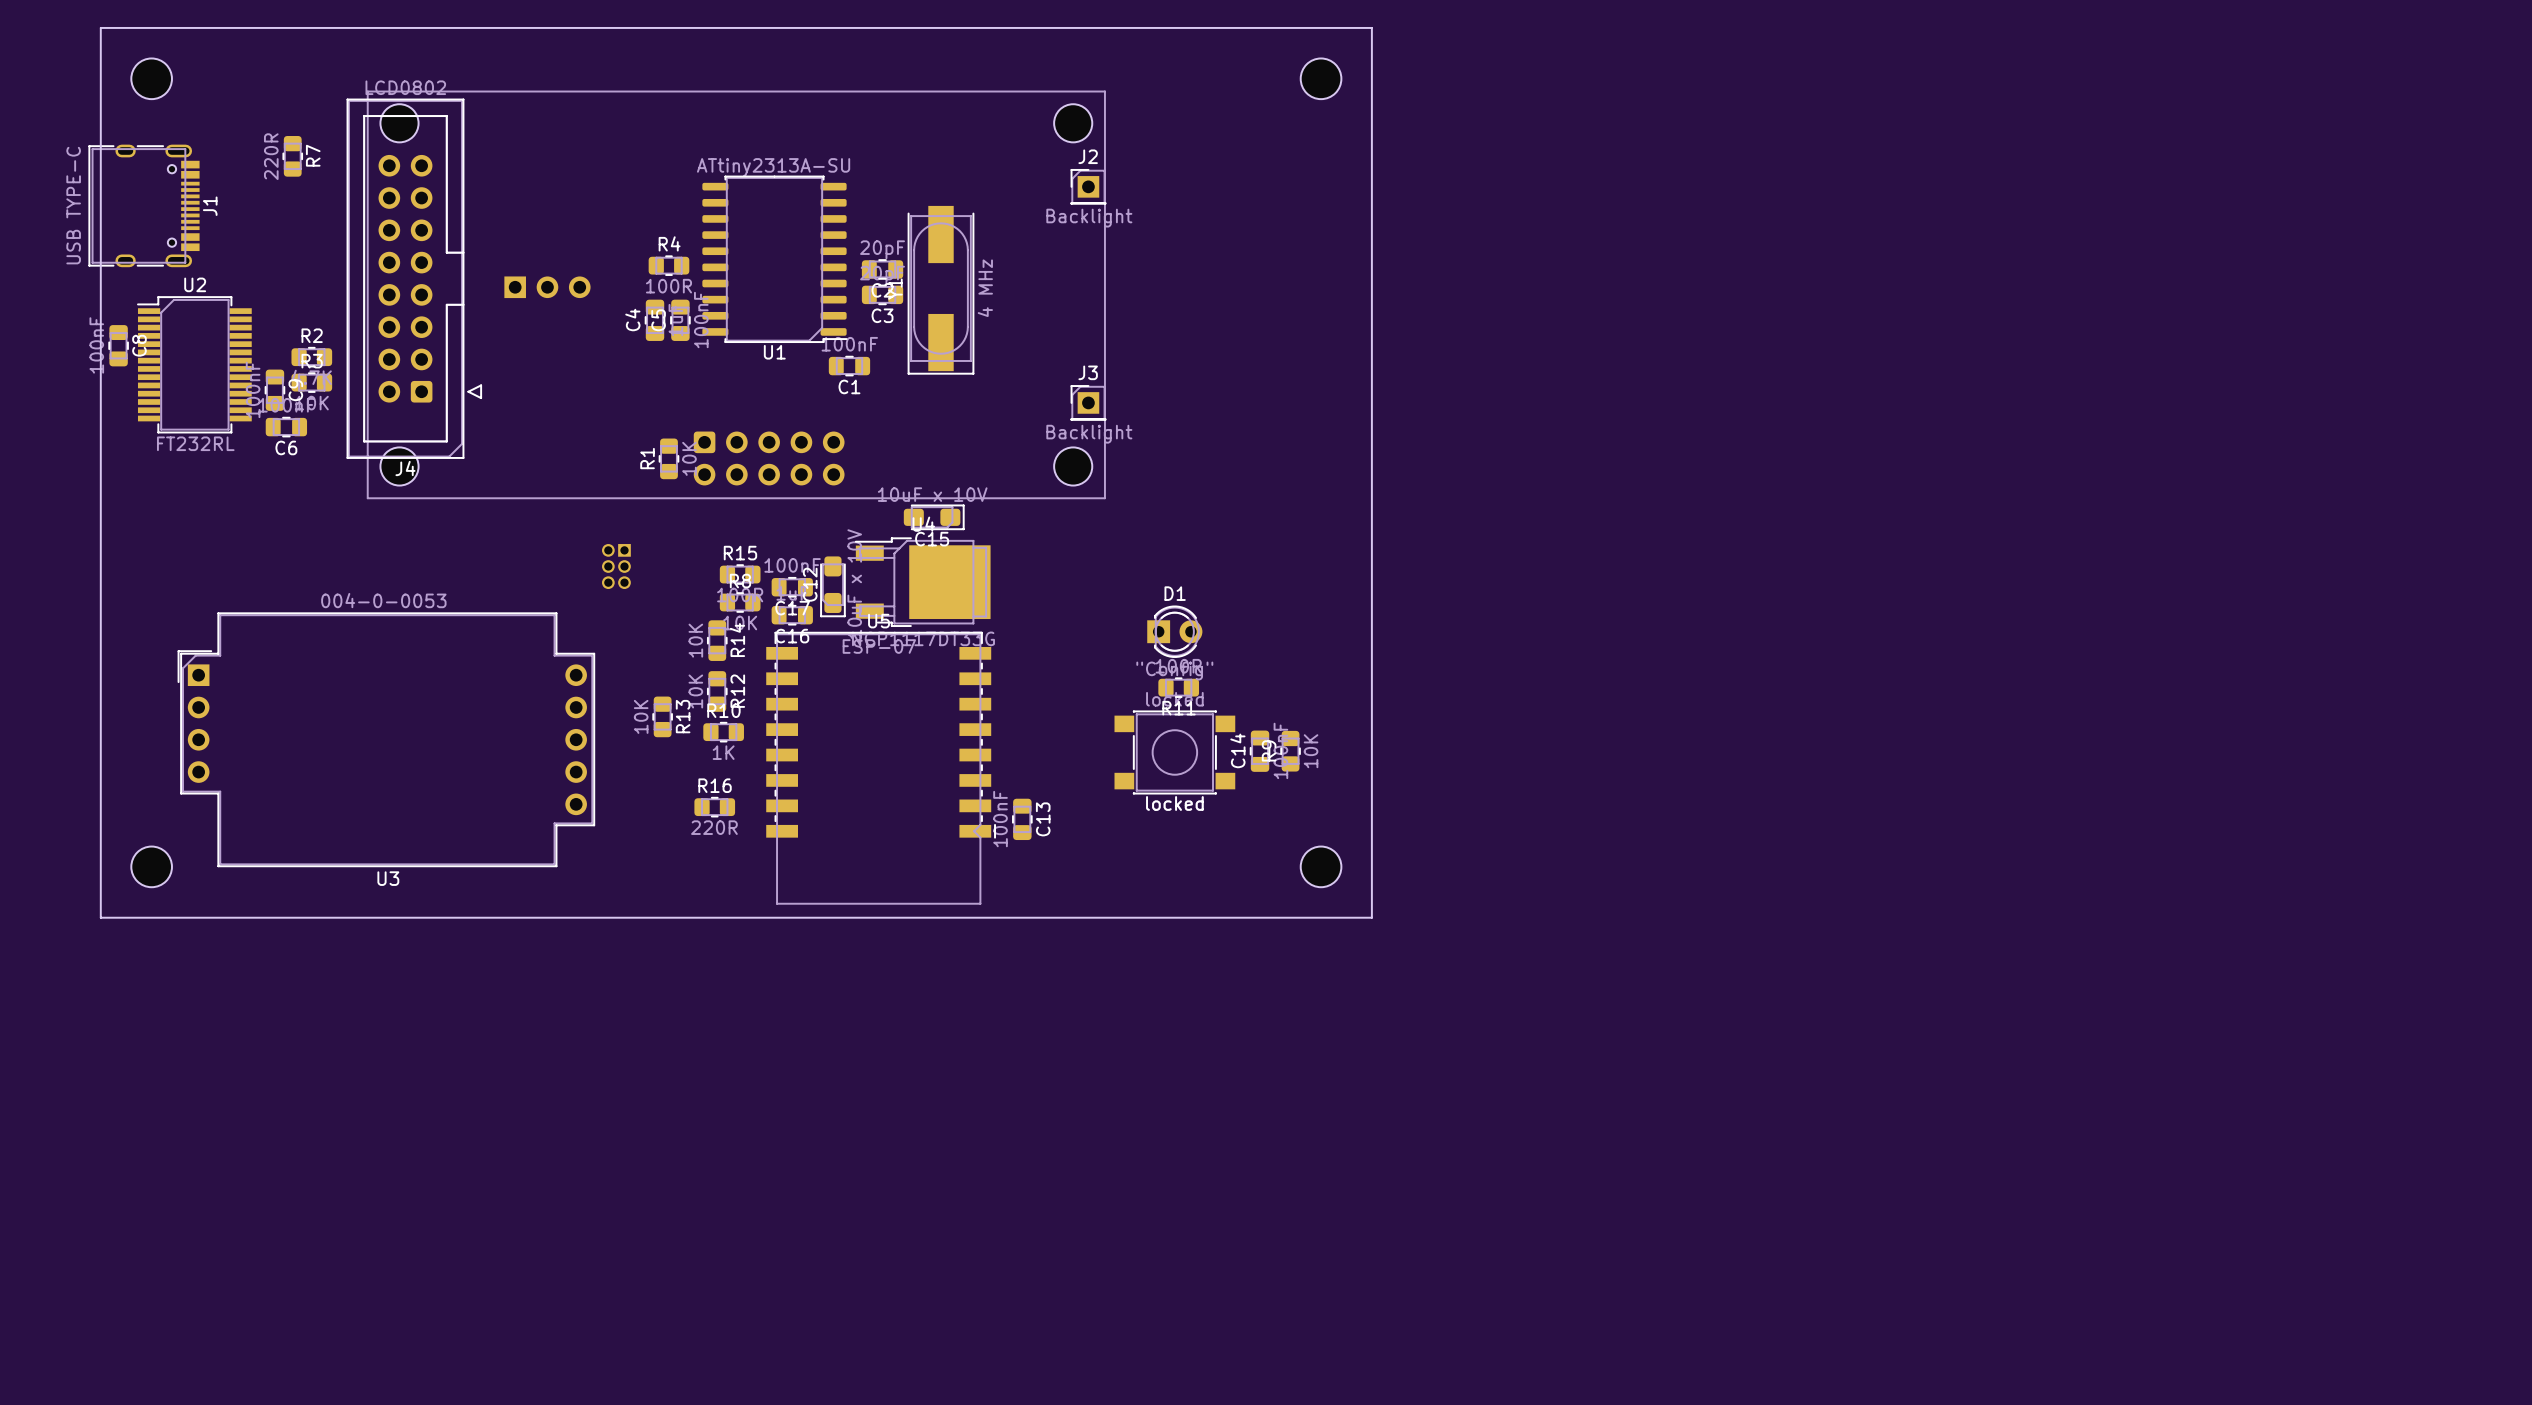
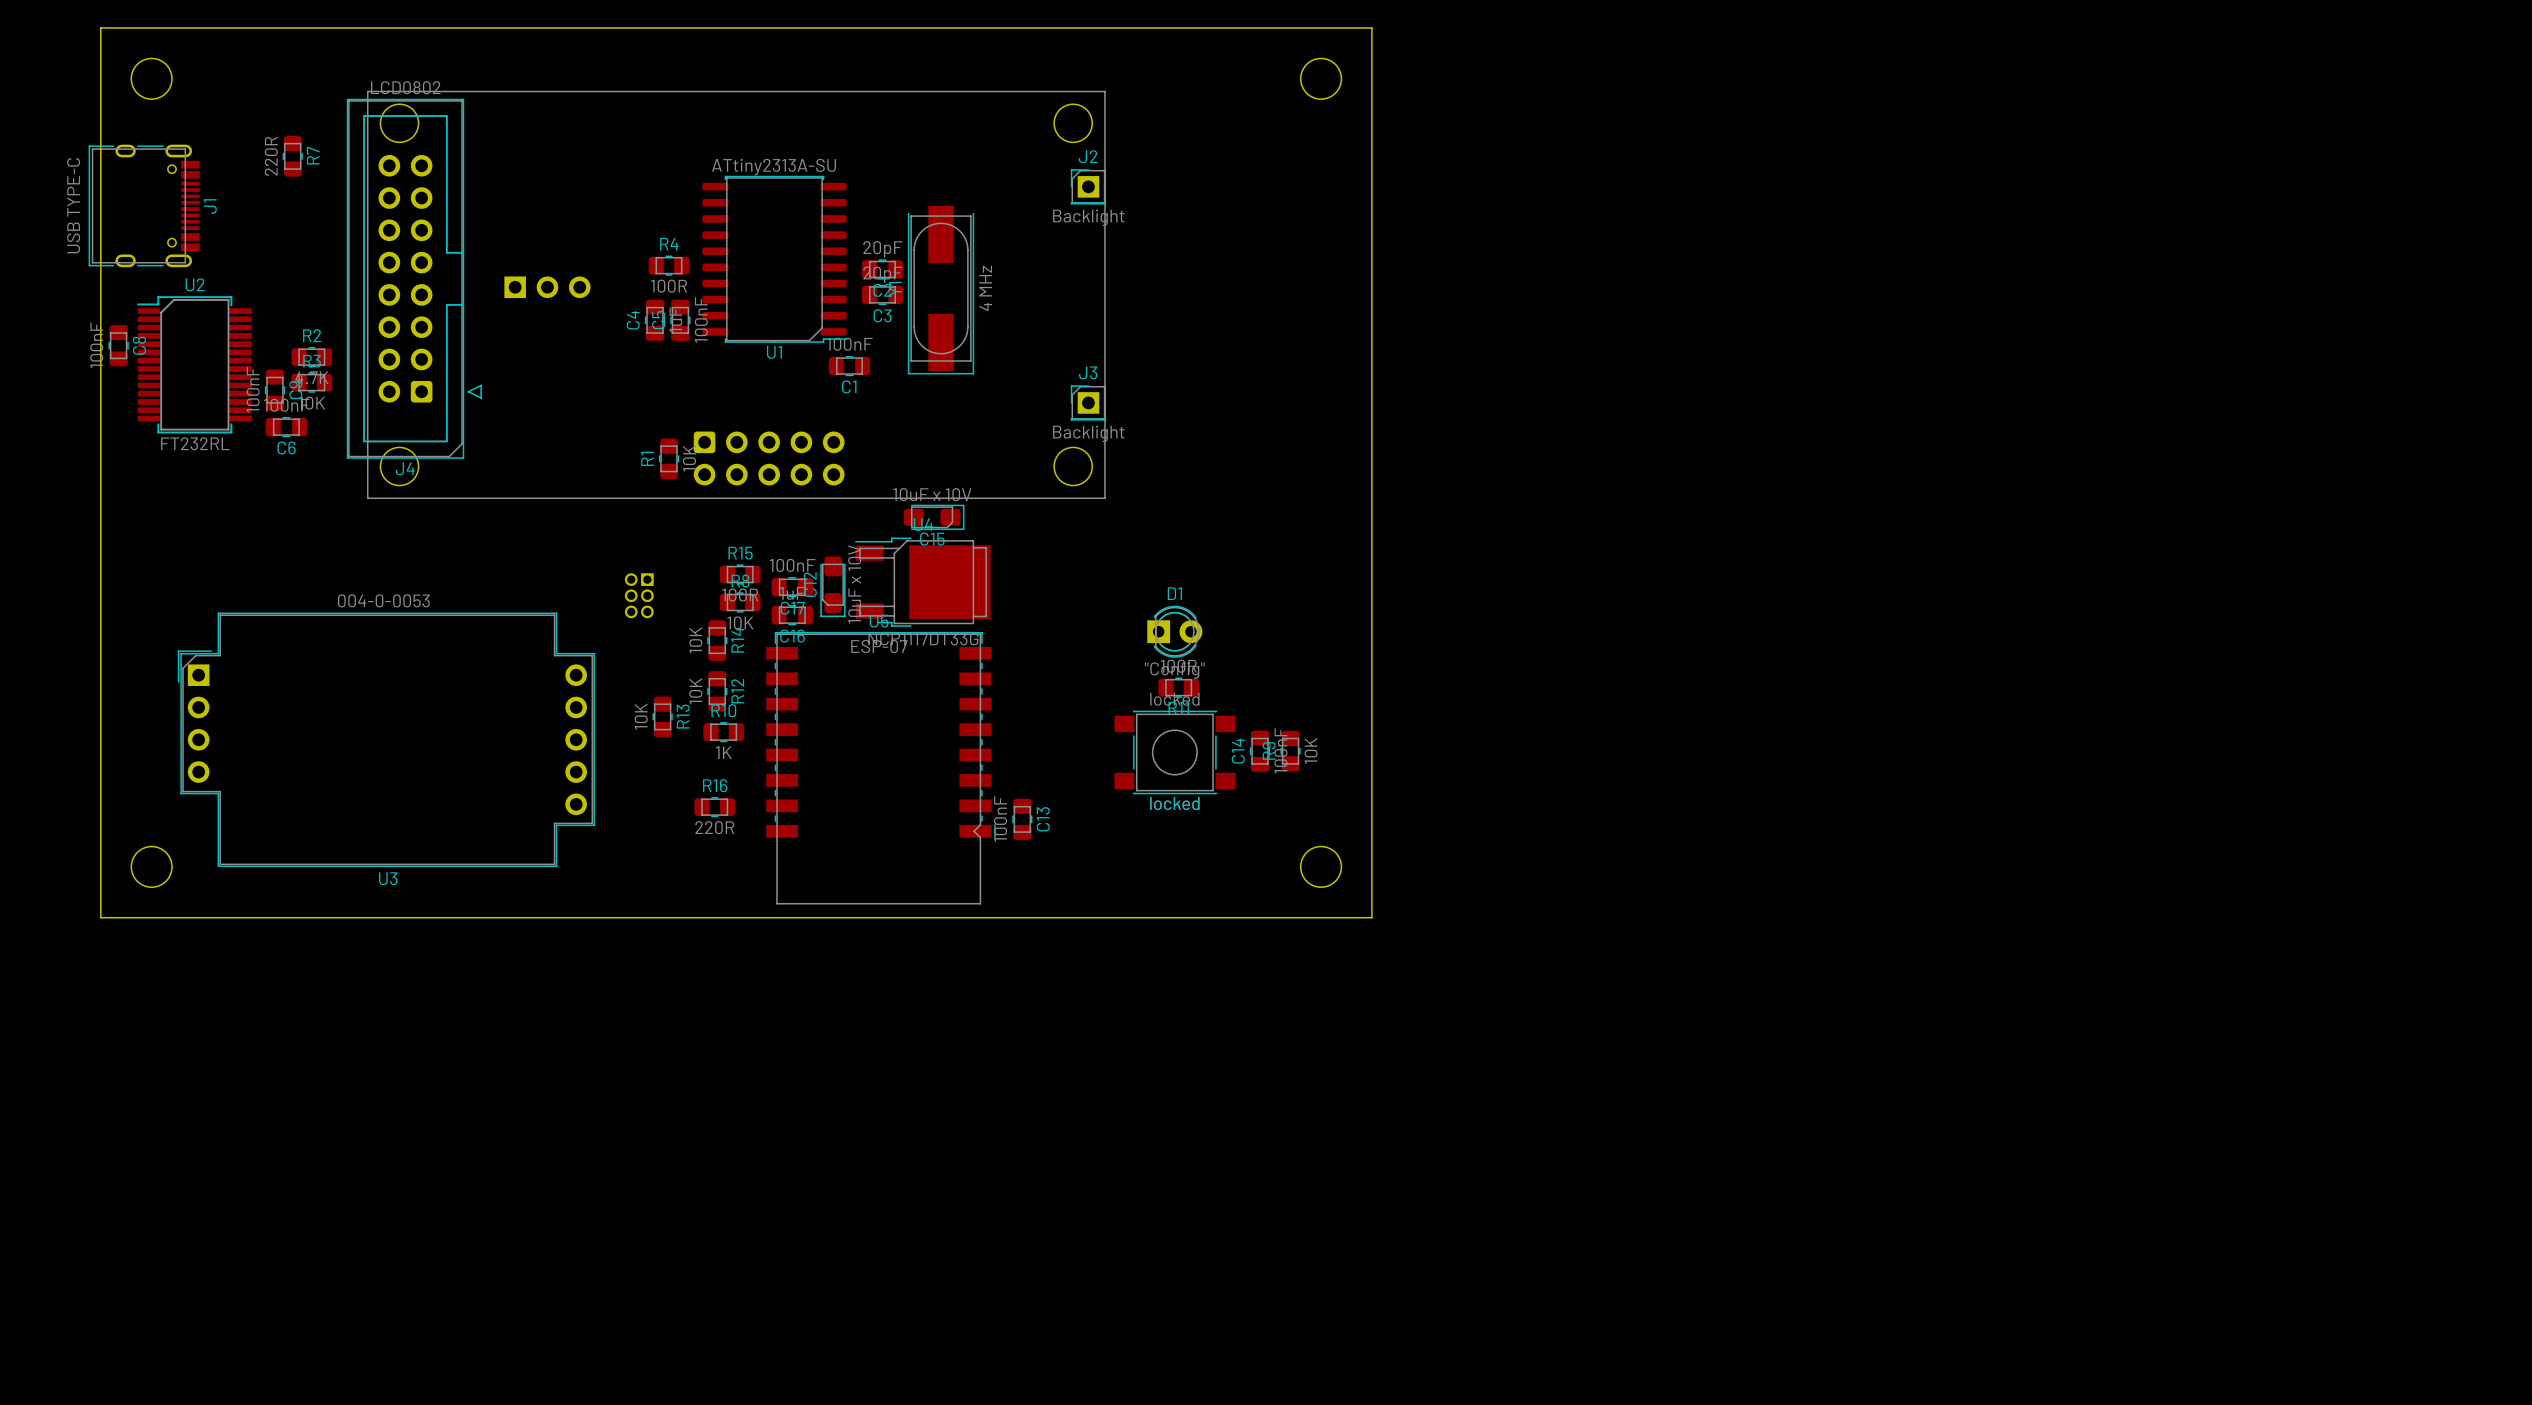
part position: (616, 566) -> (639, 595)

